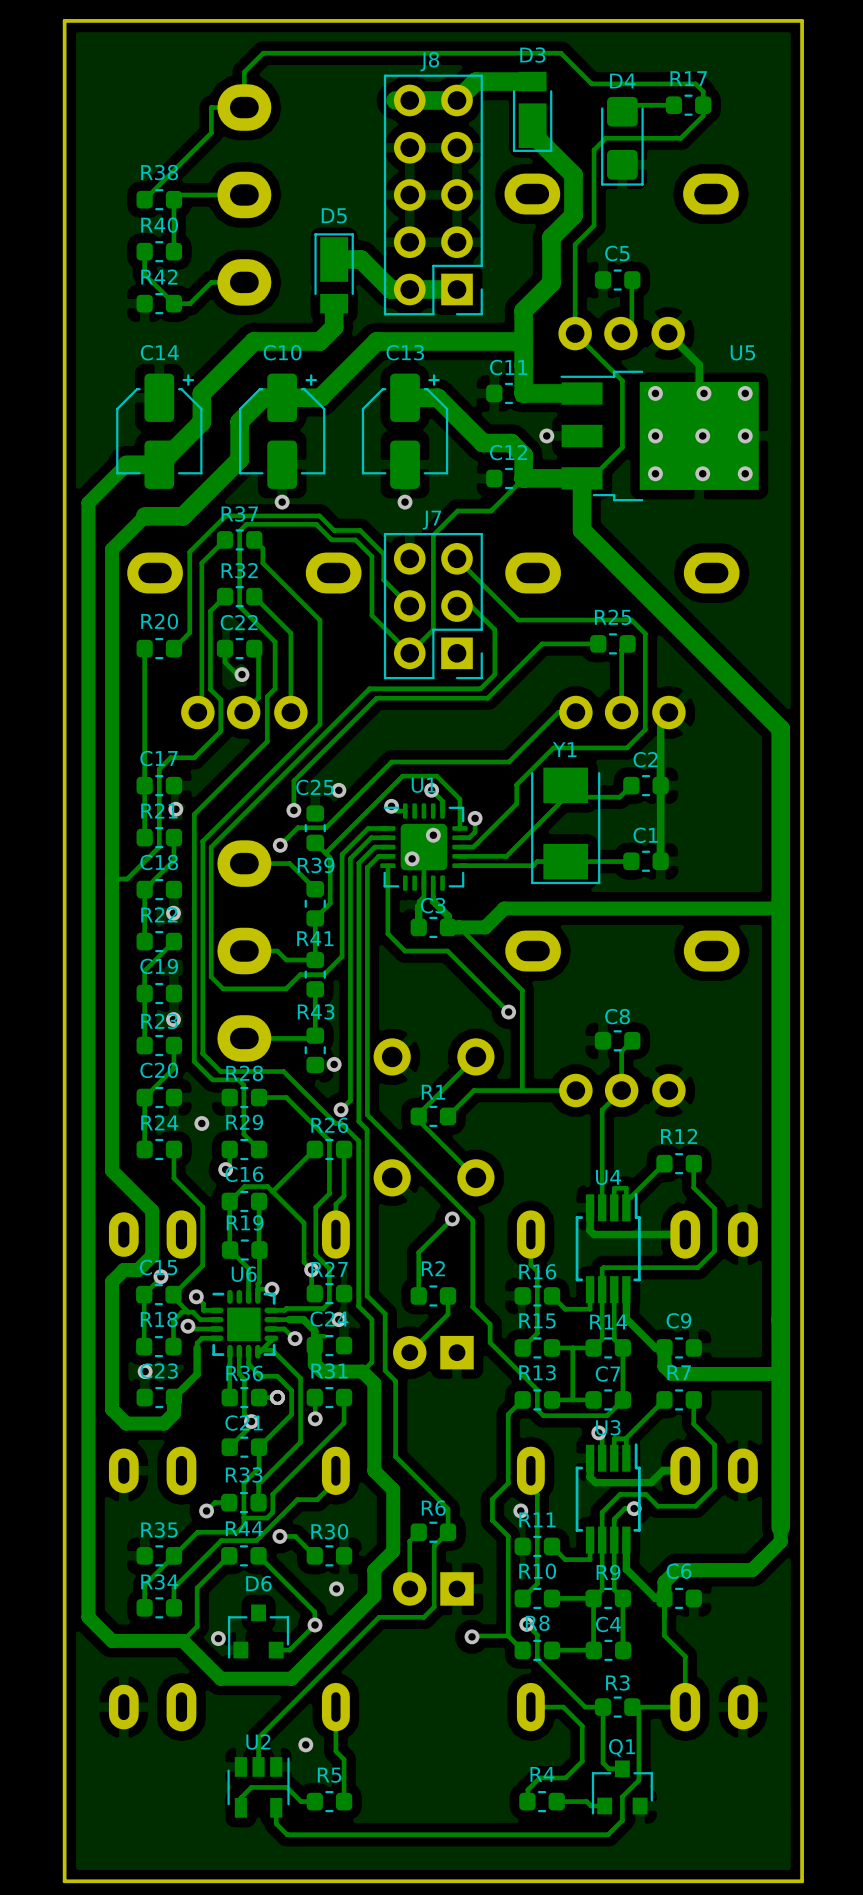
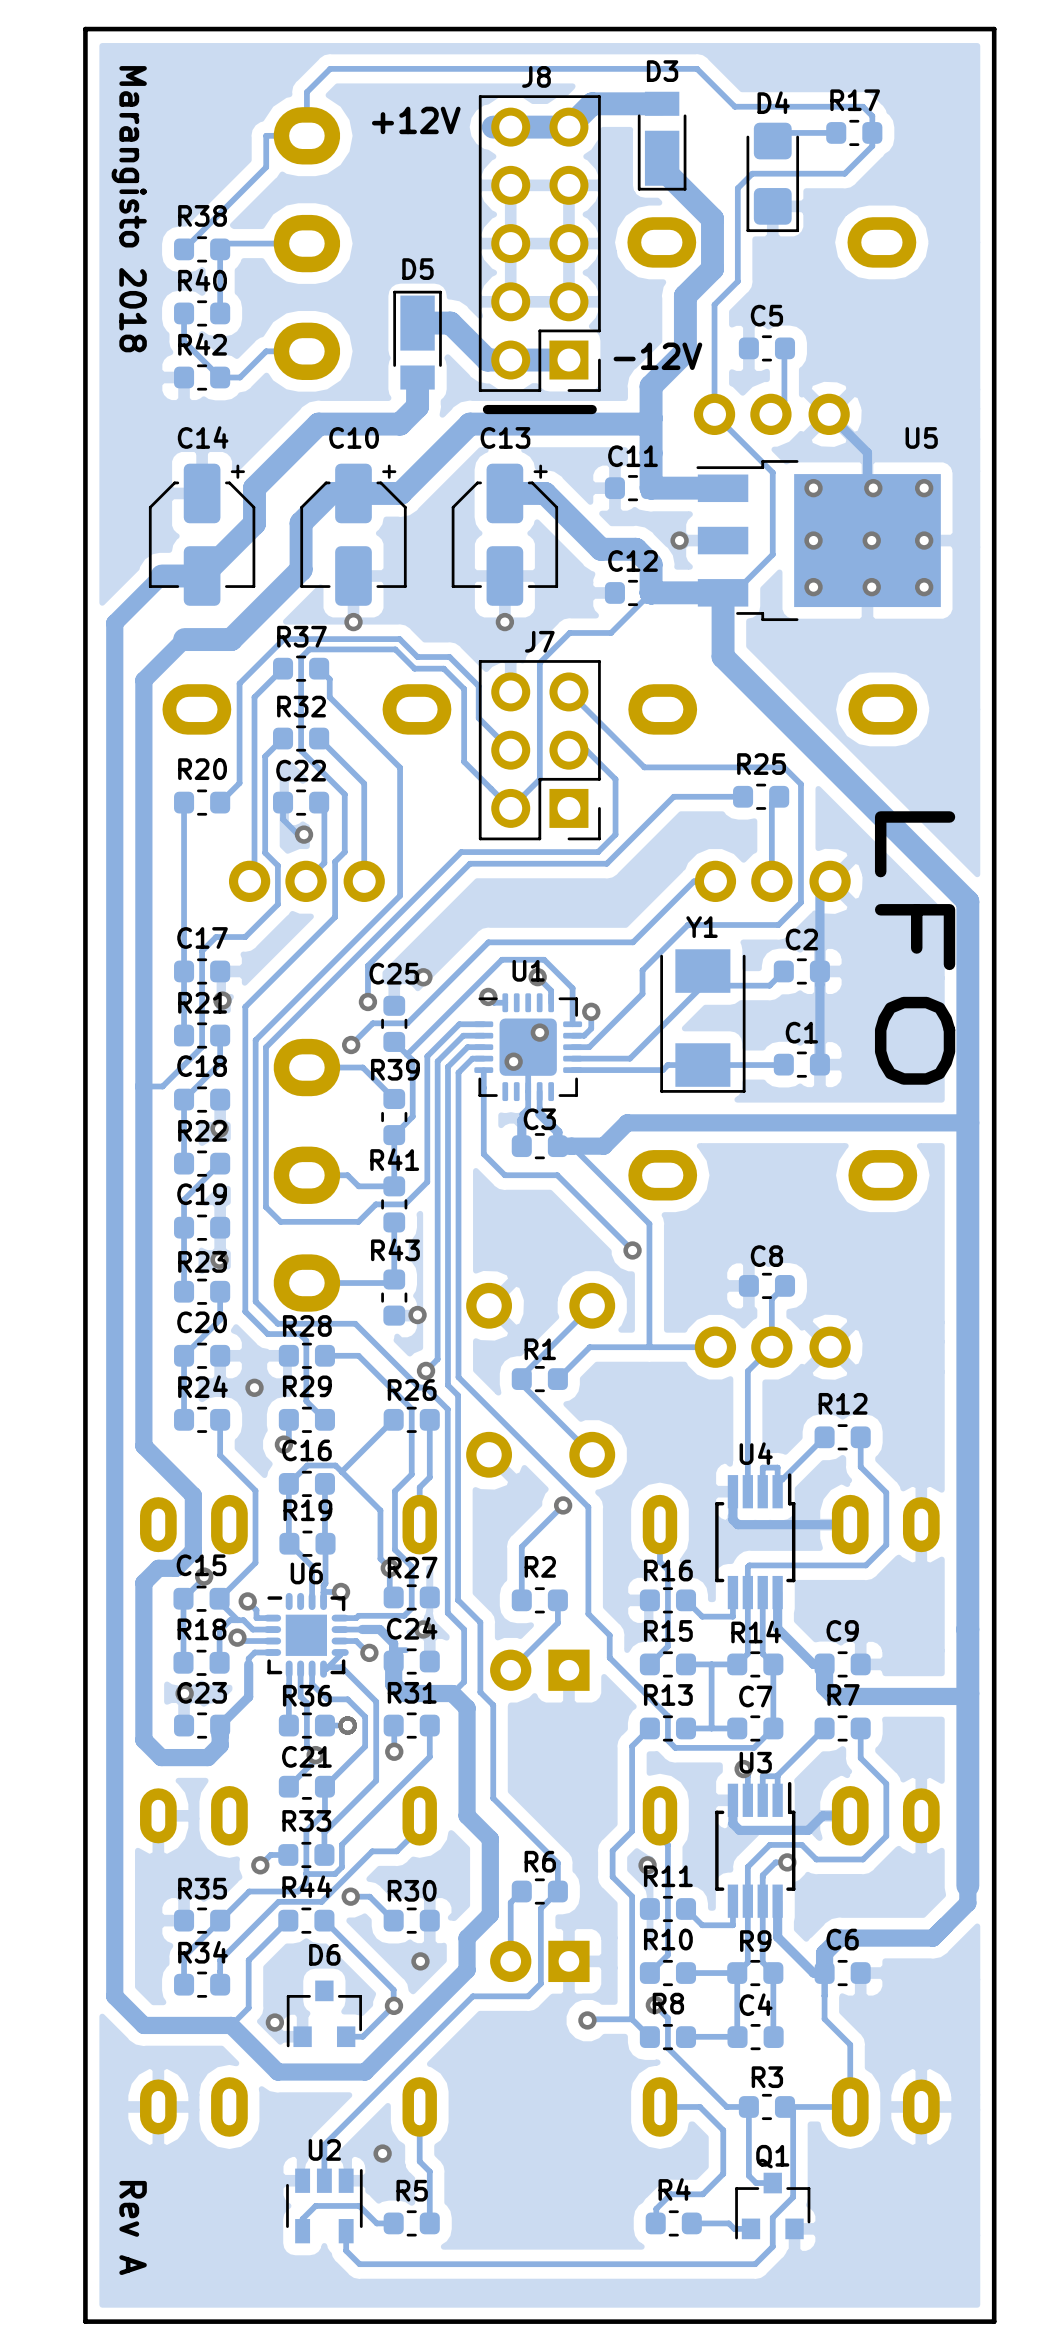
text: none -> +12V (416, 120)
text: none -> Marangisto 2018 (129, 209)
text: none -> -12V (657, 356)
line: none -> (592, 409) (487, 409)
text: none -> LFO (915, 947)
text: none -> Rev A (133, 2227)

